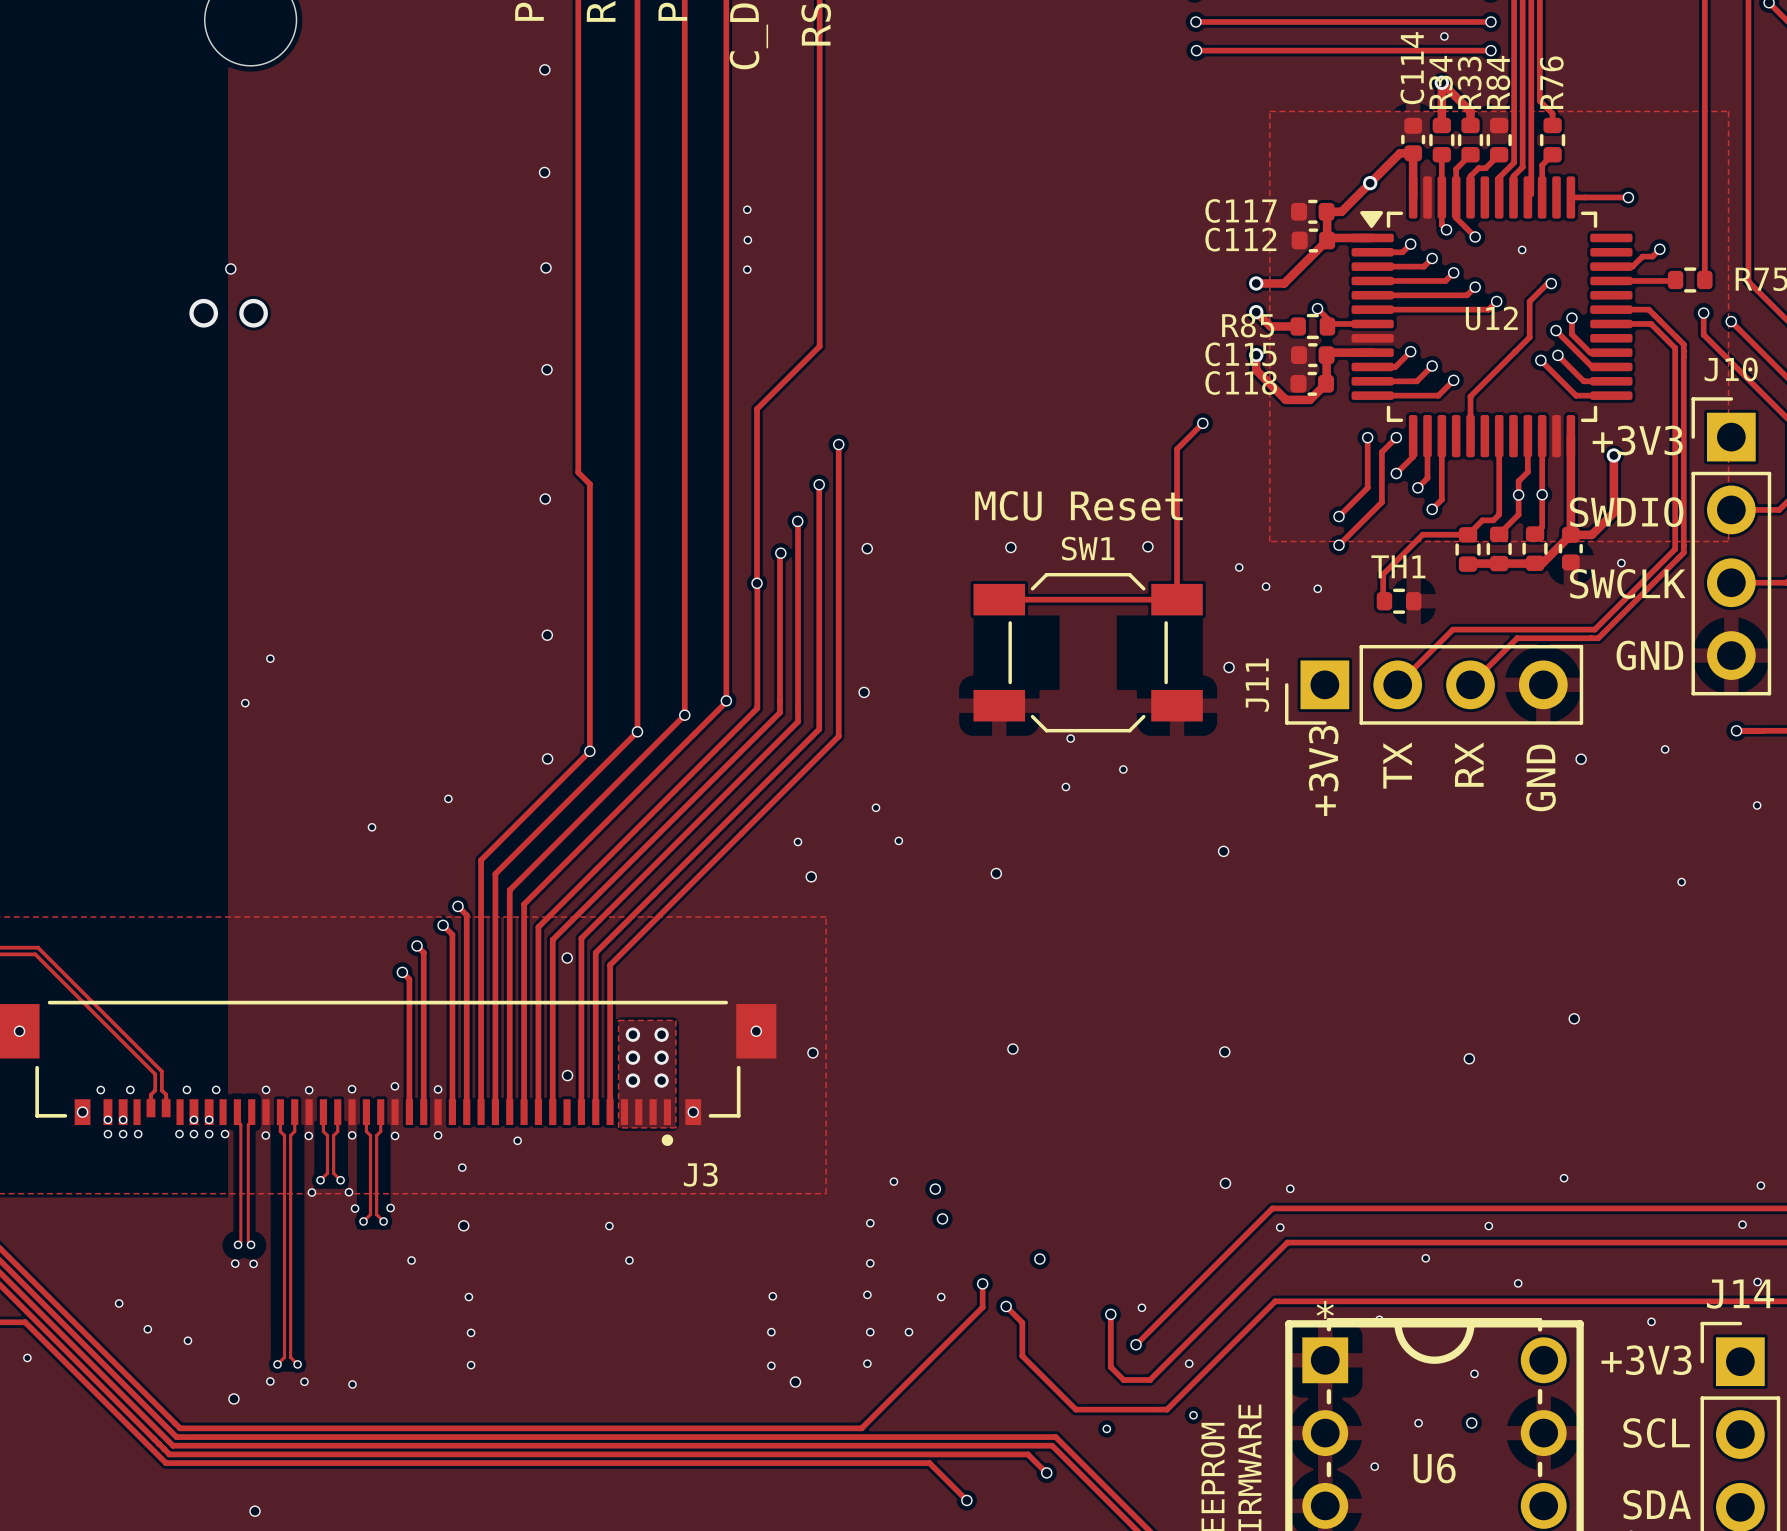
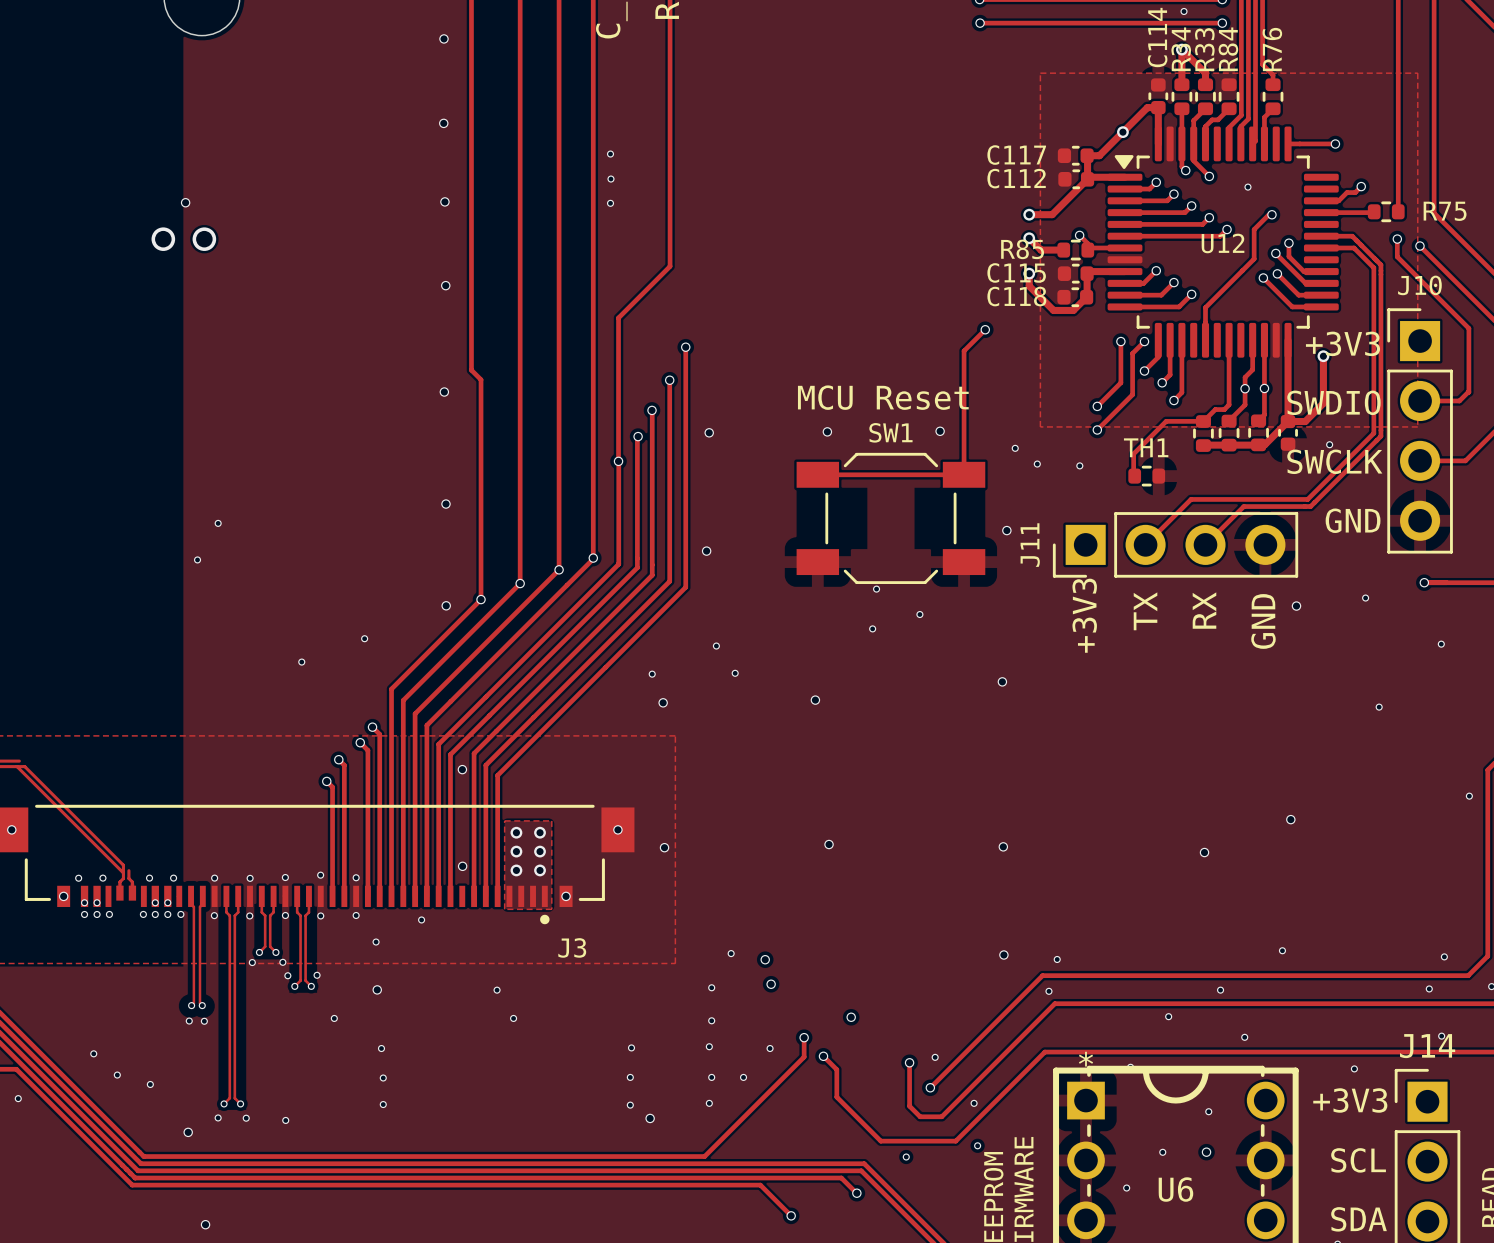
track: (28, 947) (38, 947) (161, 1071) (161, 1080) -> none
track: none -> (17, 766) (123, 872)

